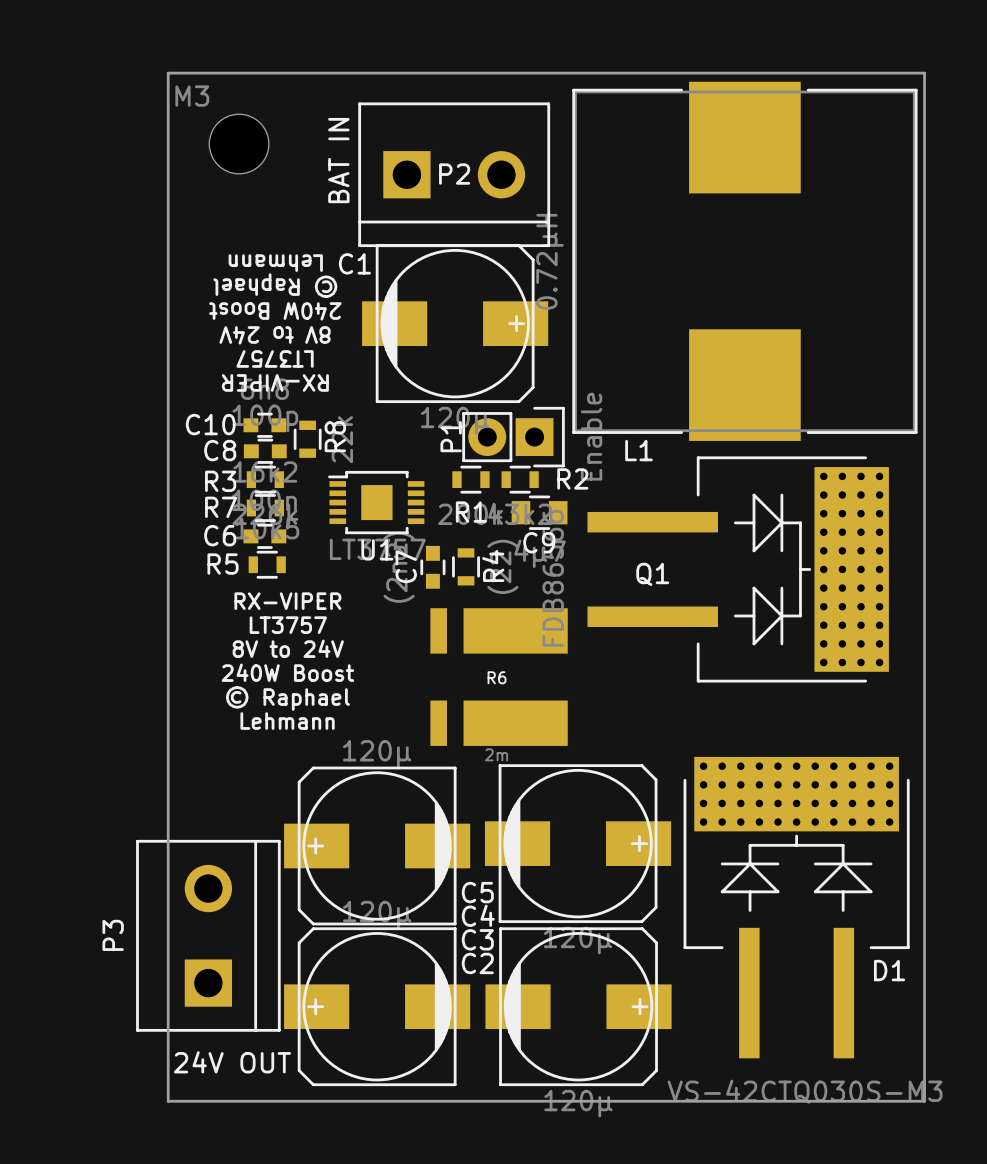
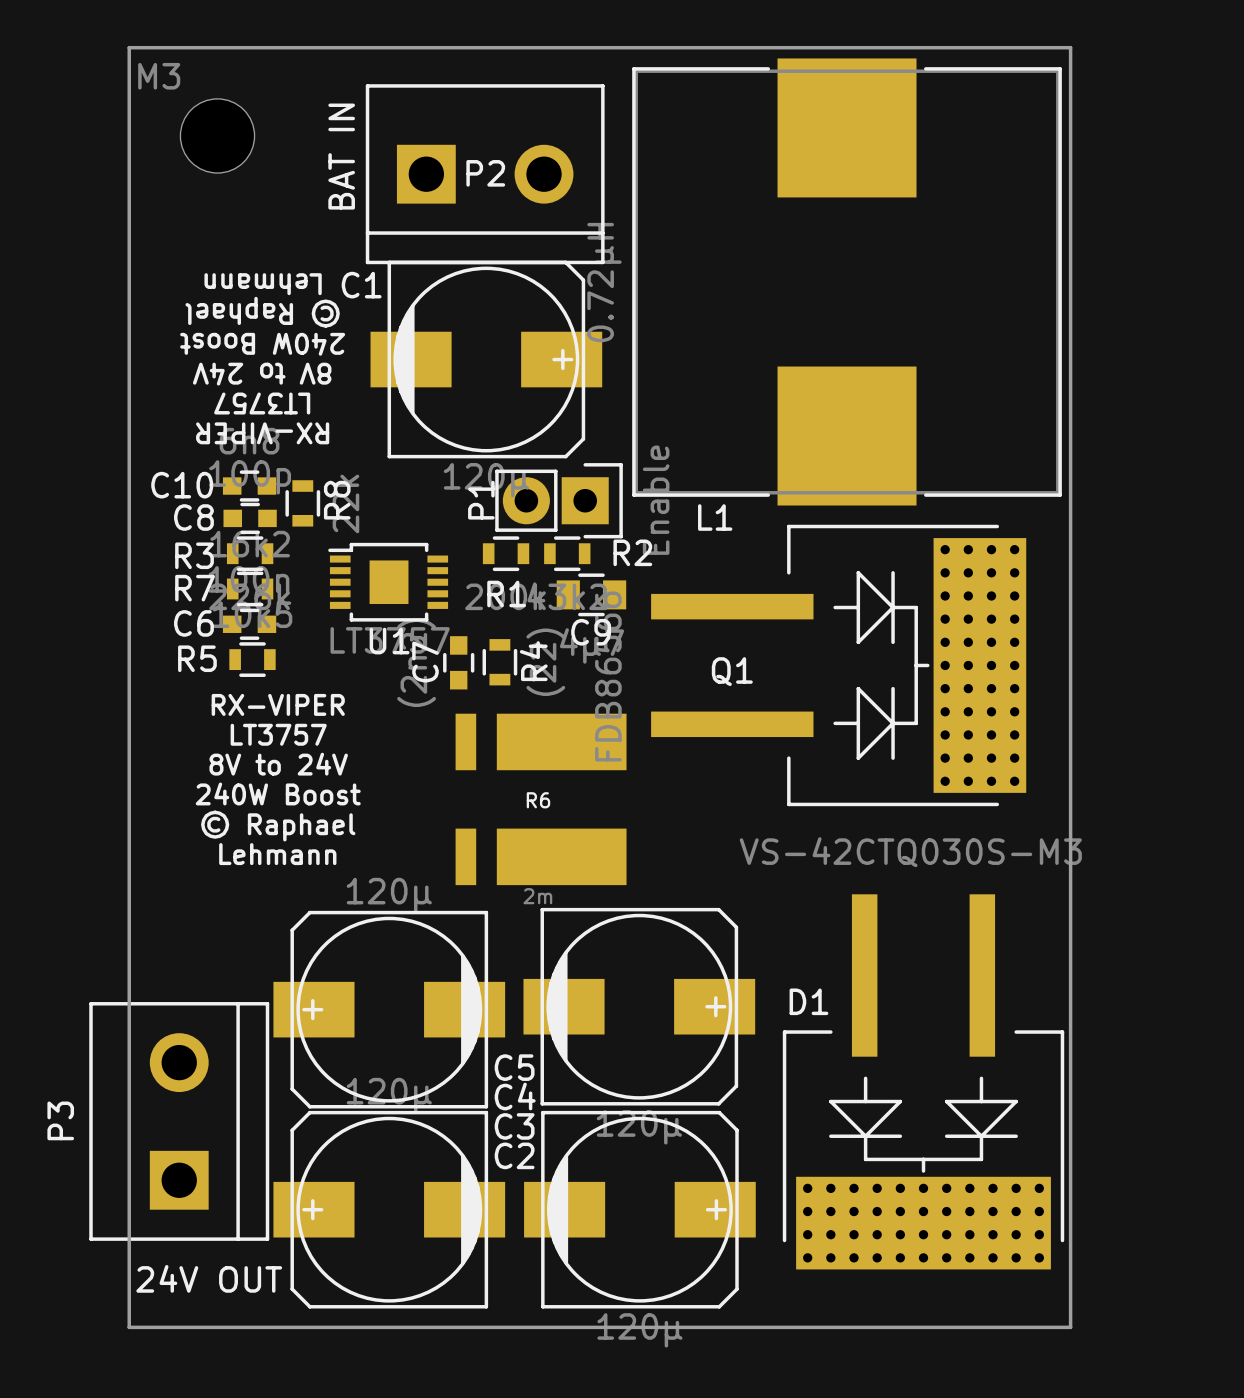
D1 rotation: 0° (796, 907) -> 180° (923, 1081)

